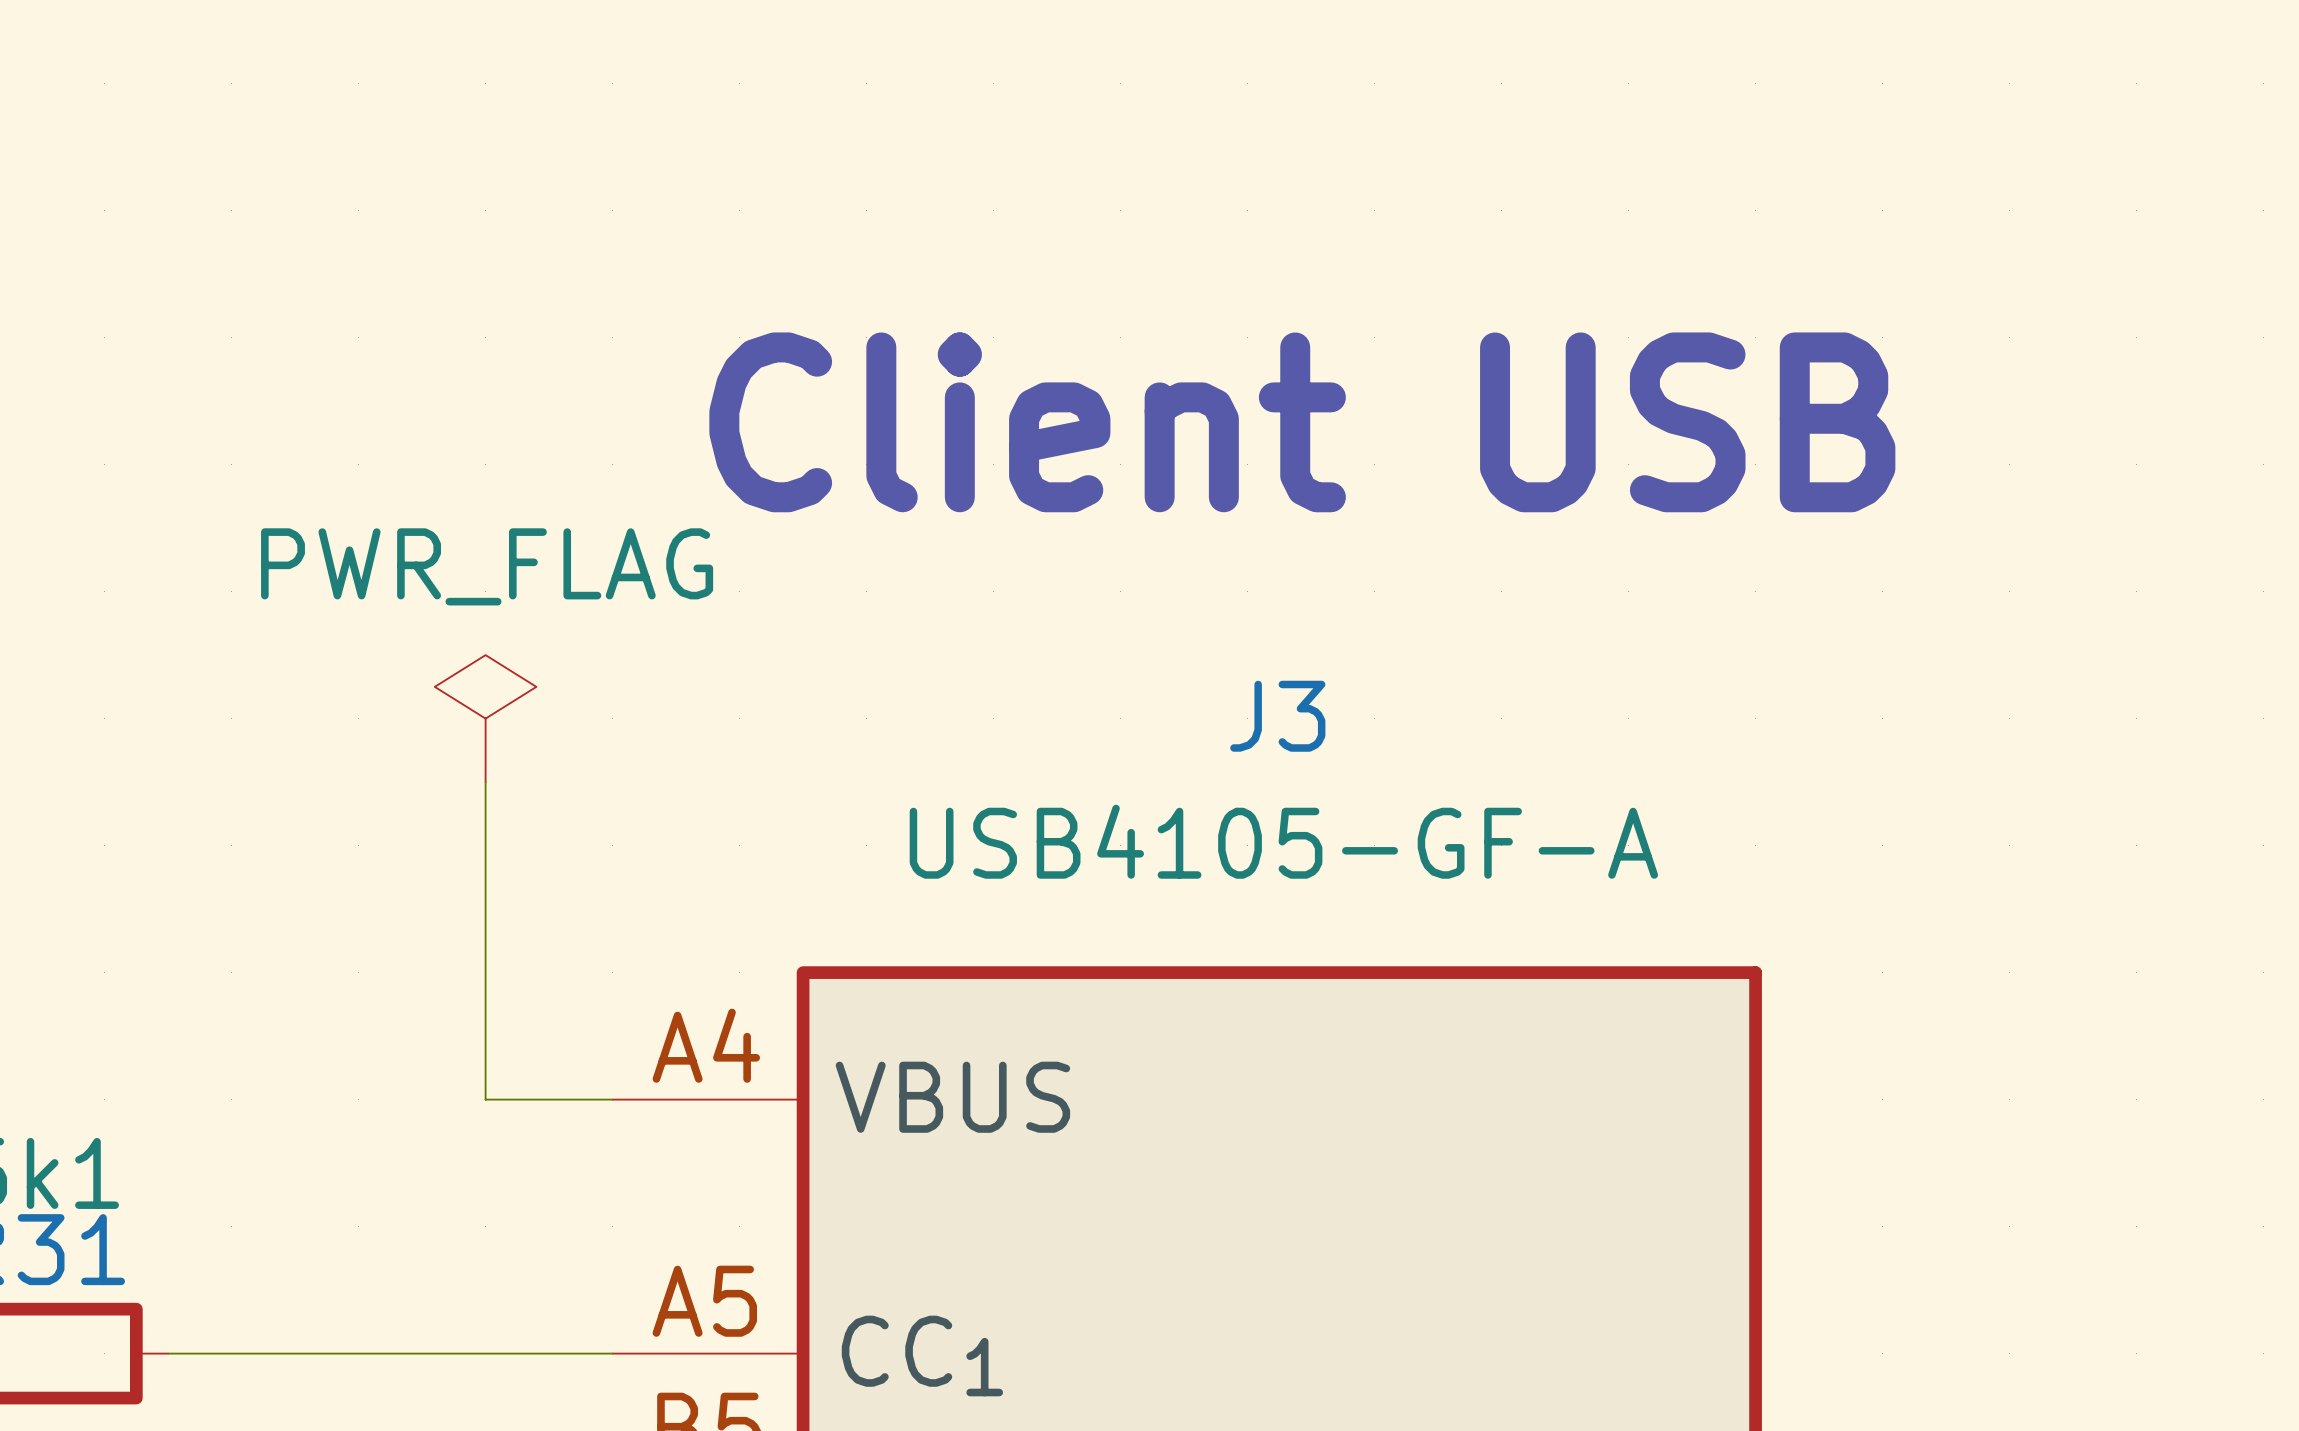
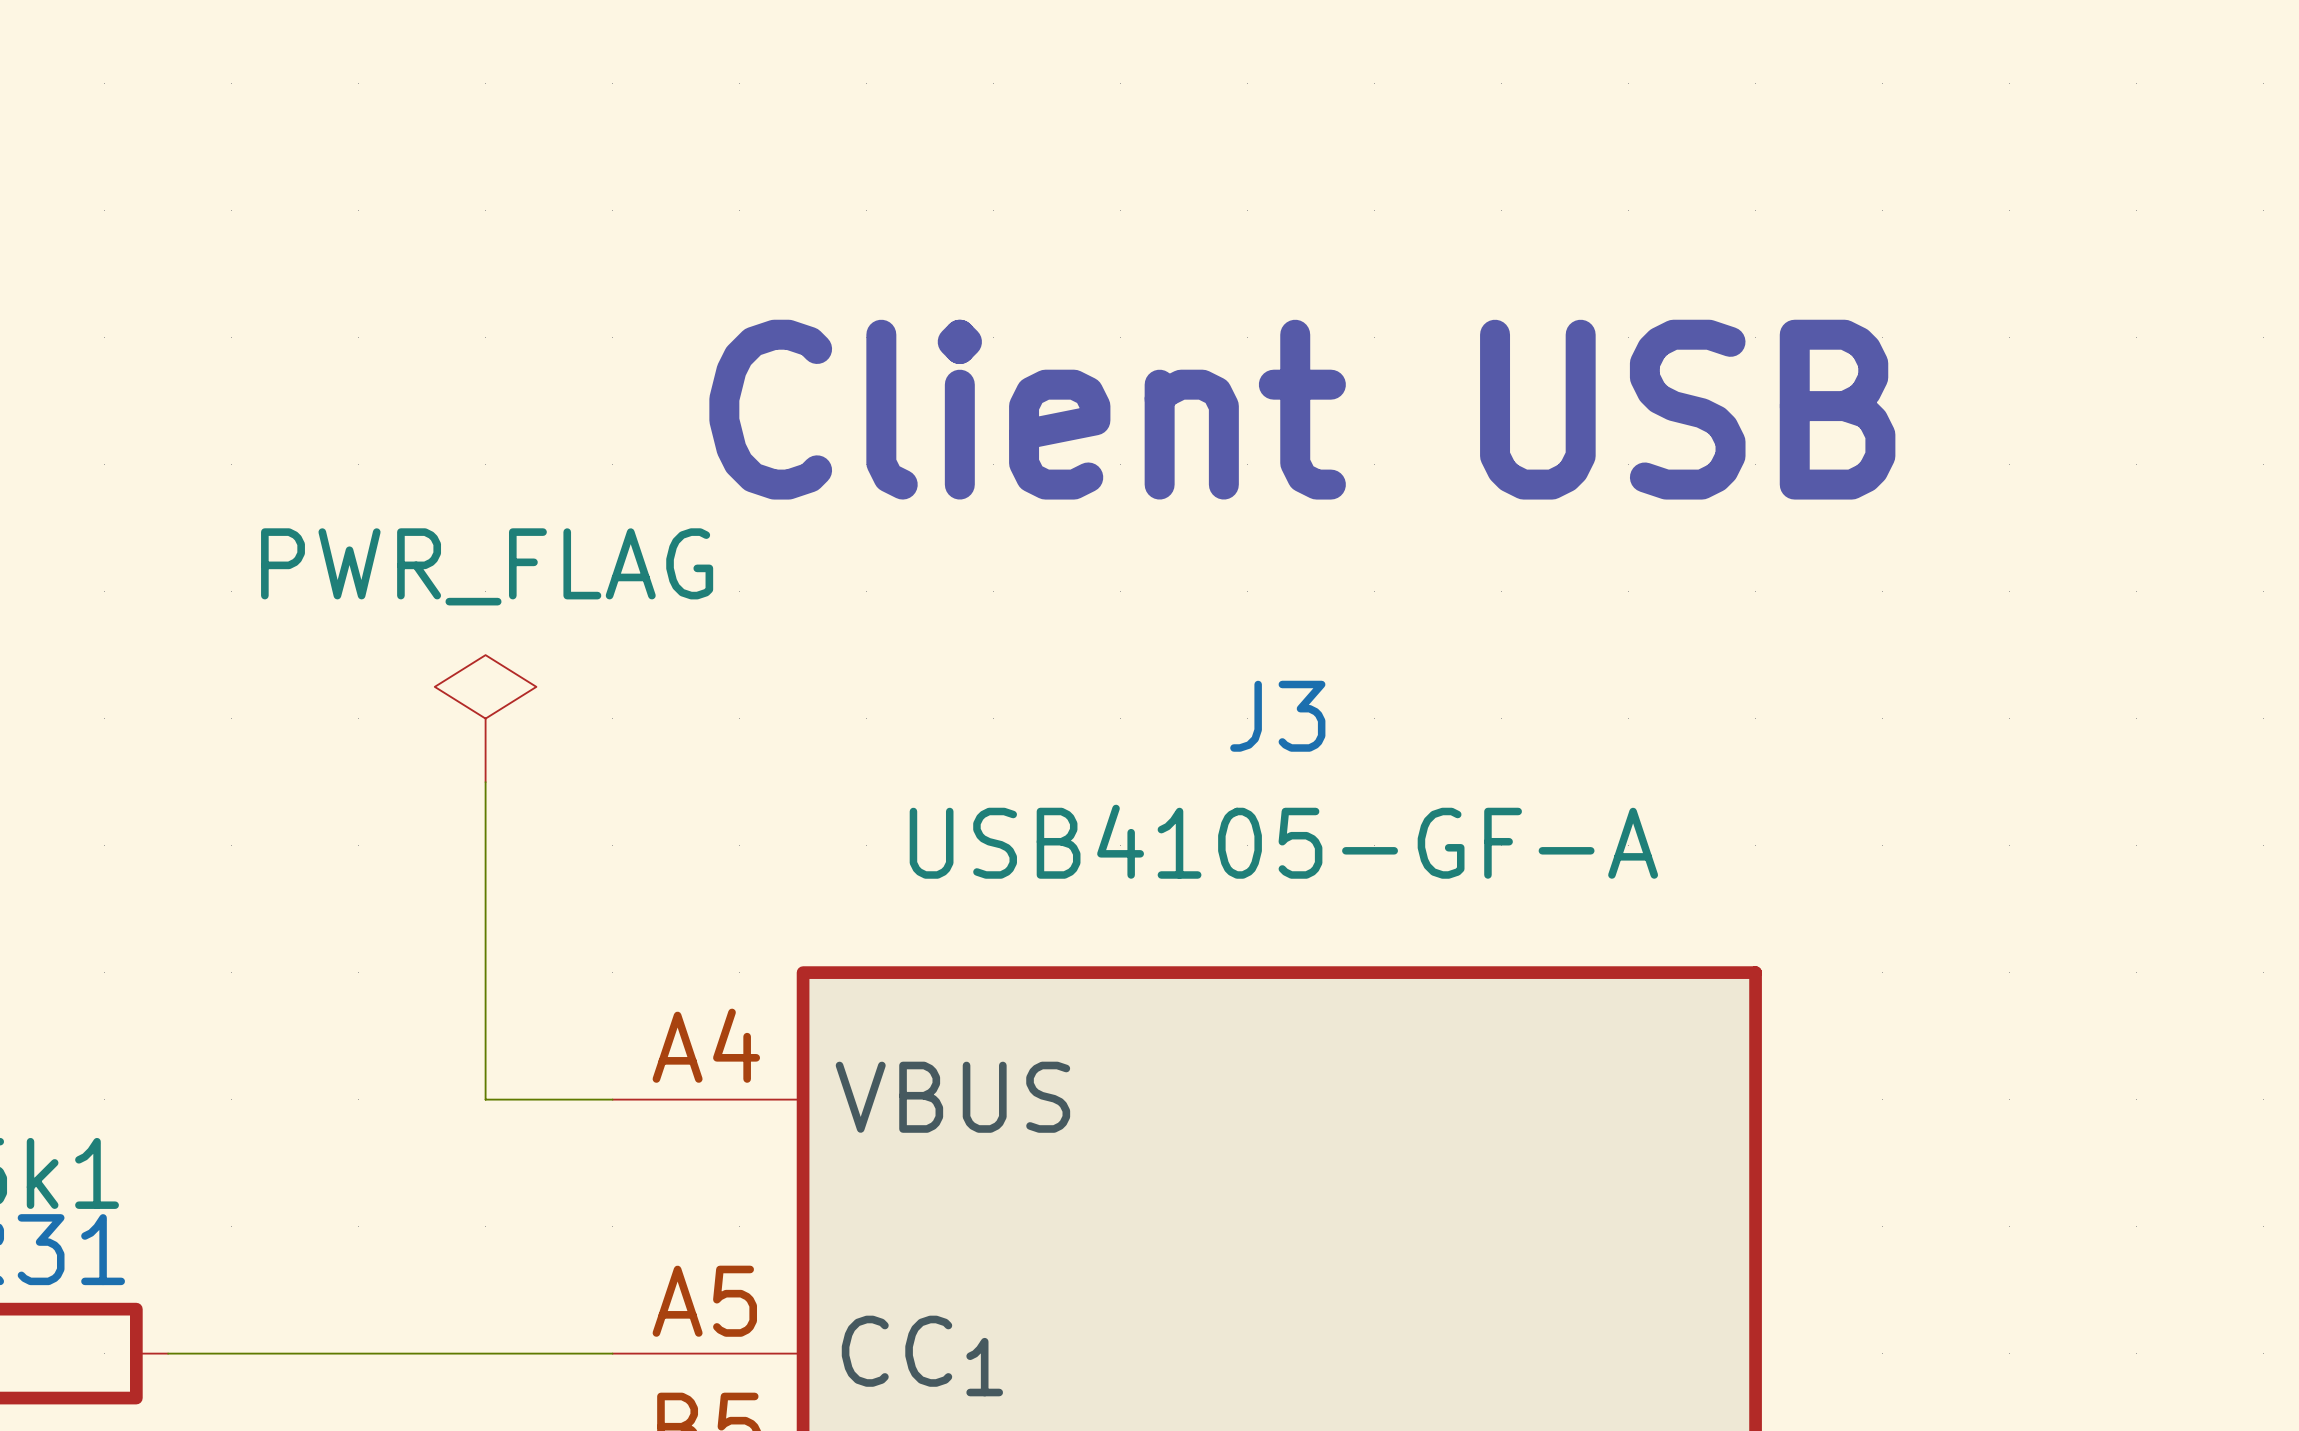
text position: Client USB (1302, 422) -> Client USB (1302, 409)

